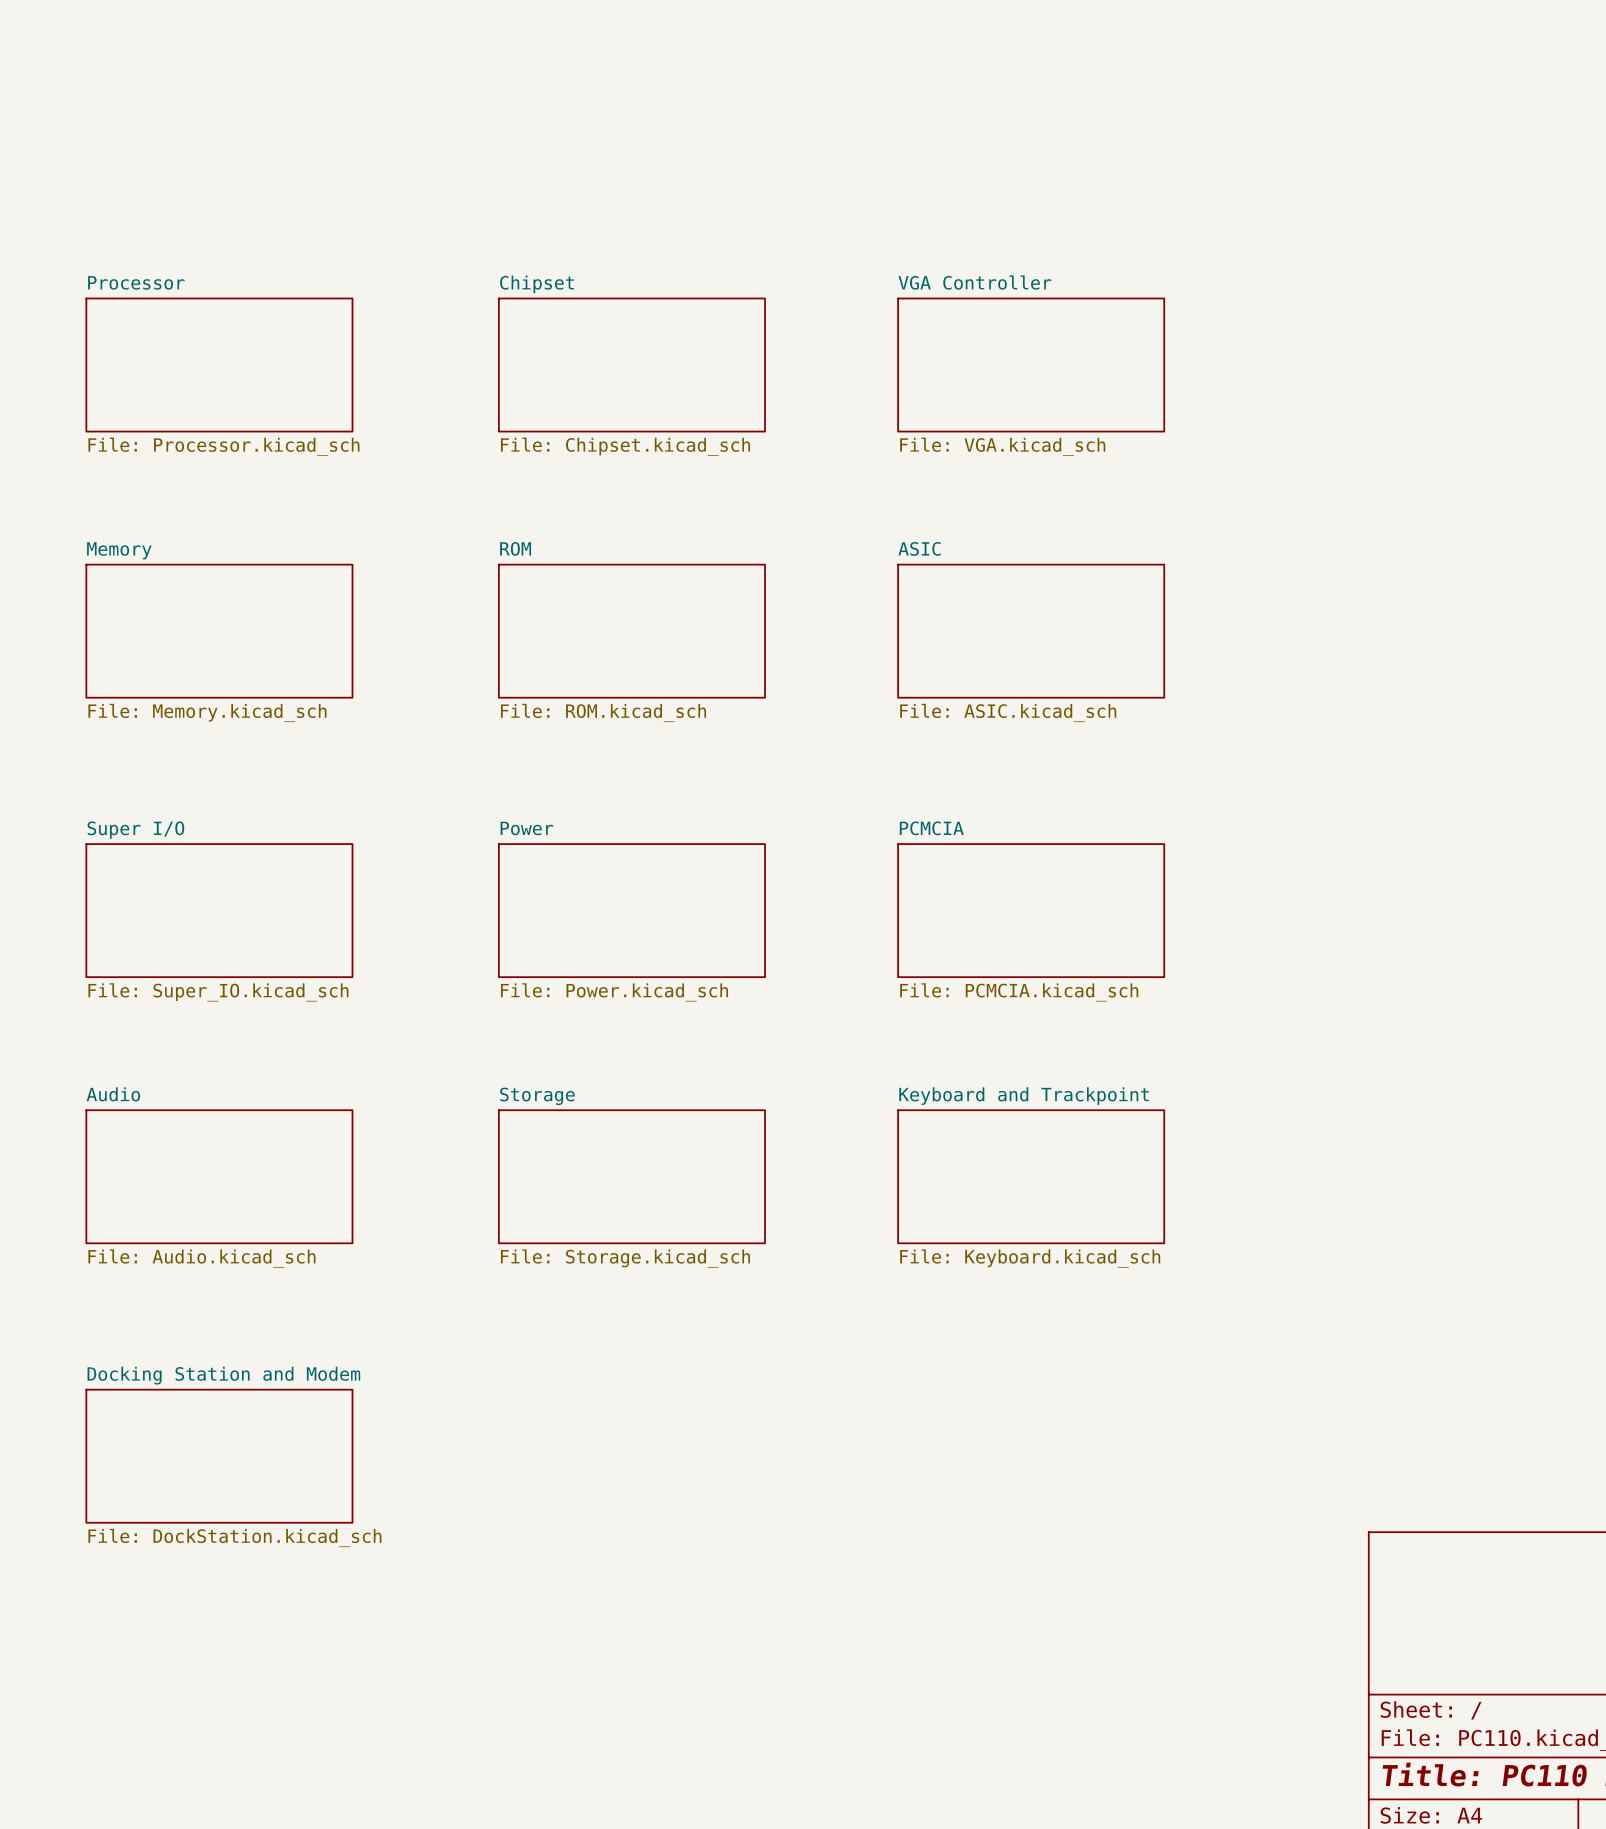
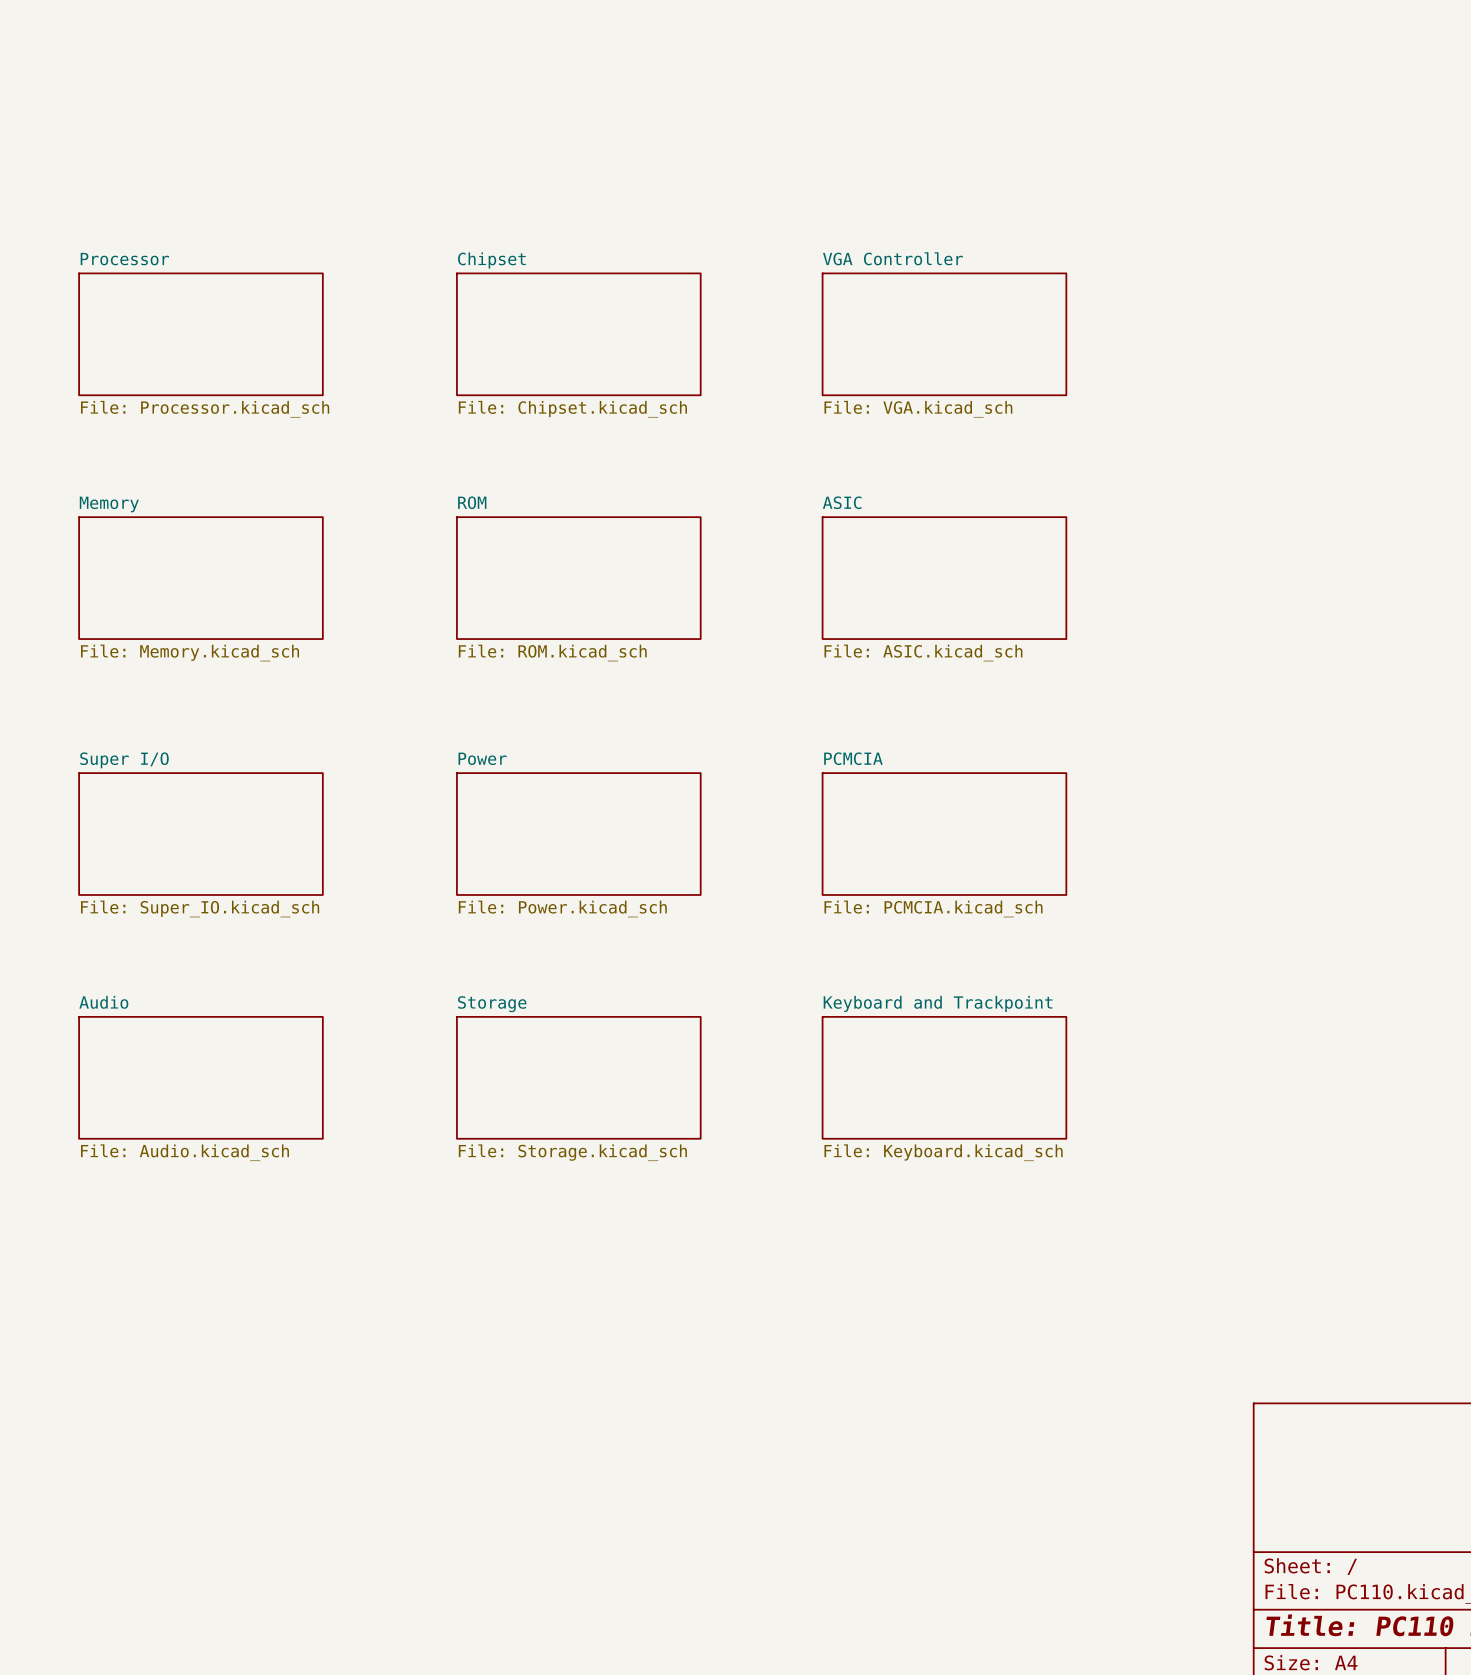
sheet Docking Station and Modem: File: DockStation.kicad_sch (219, 1456) -> none

